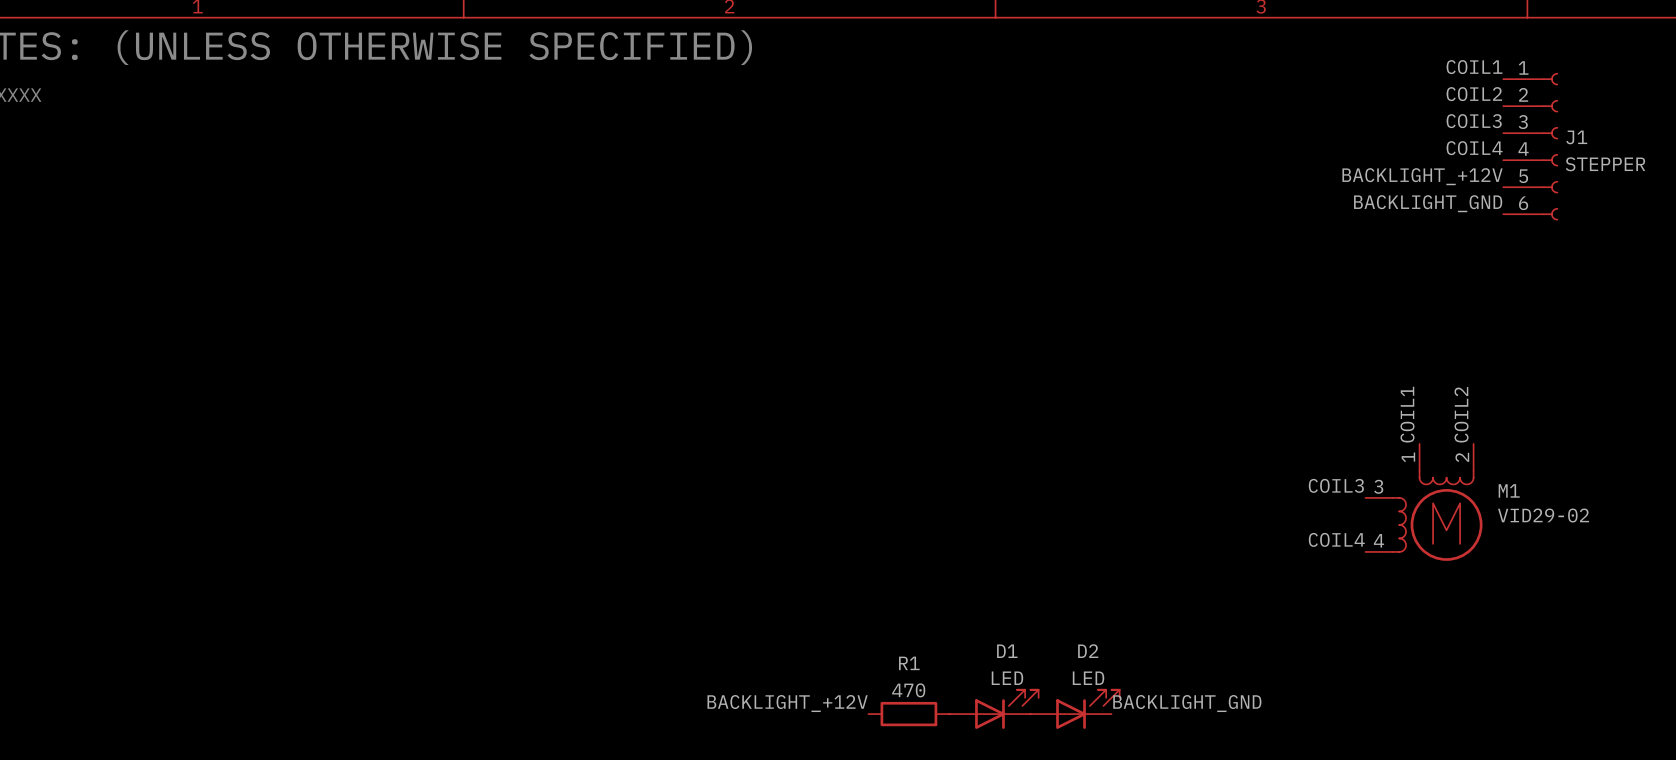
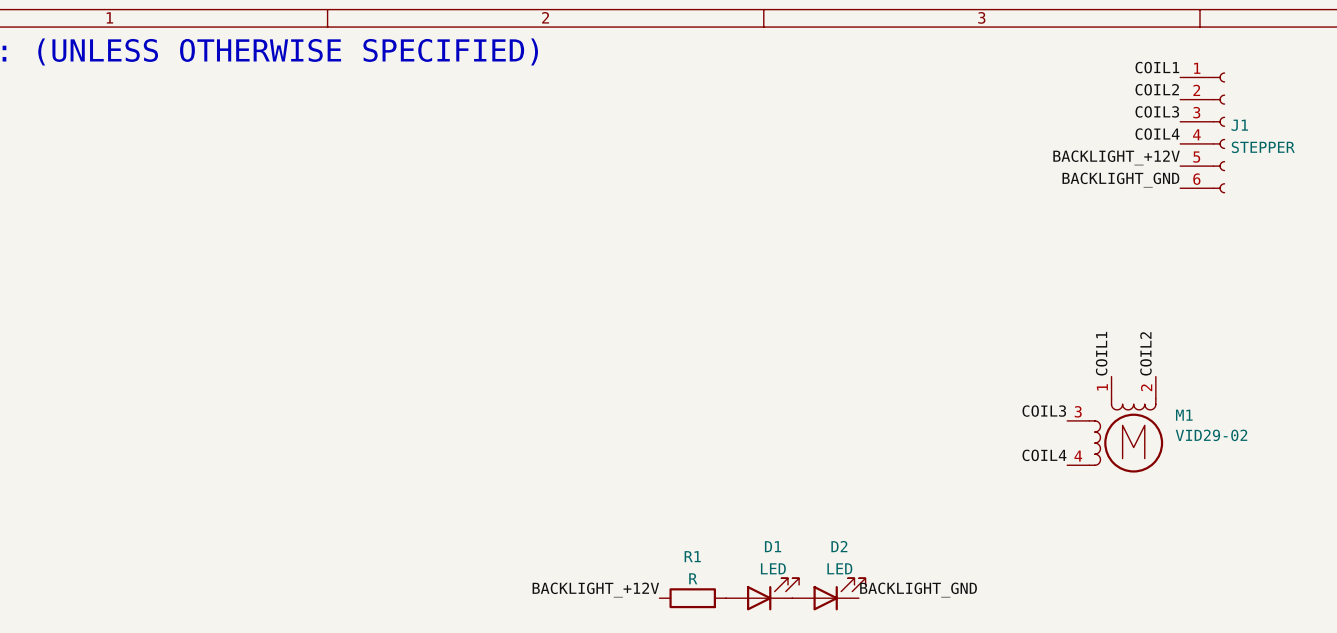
R1 value: 470 (908, 690) -> R (693, 578)

